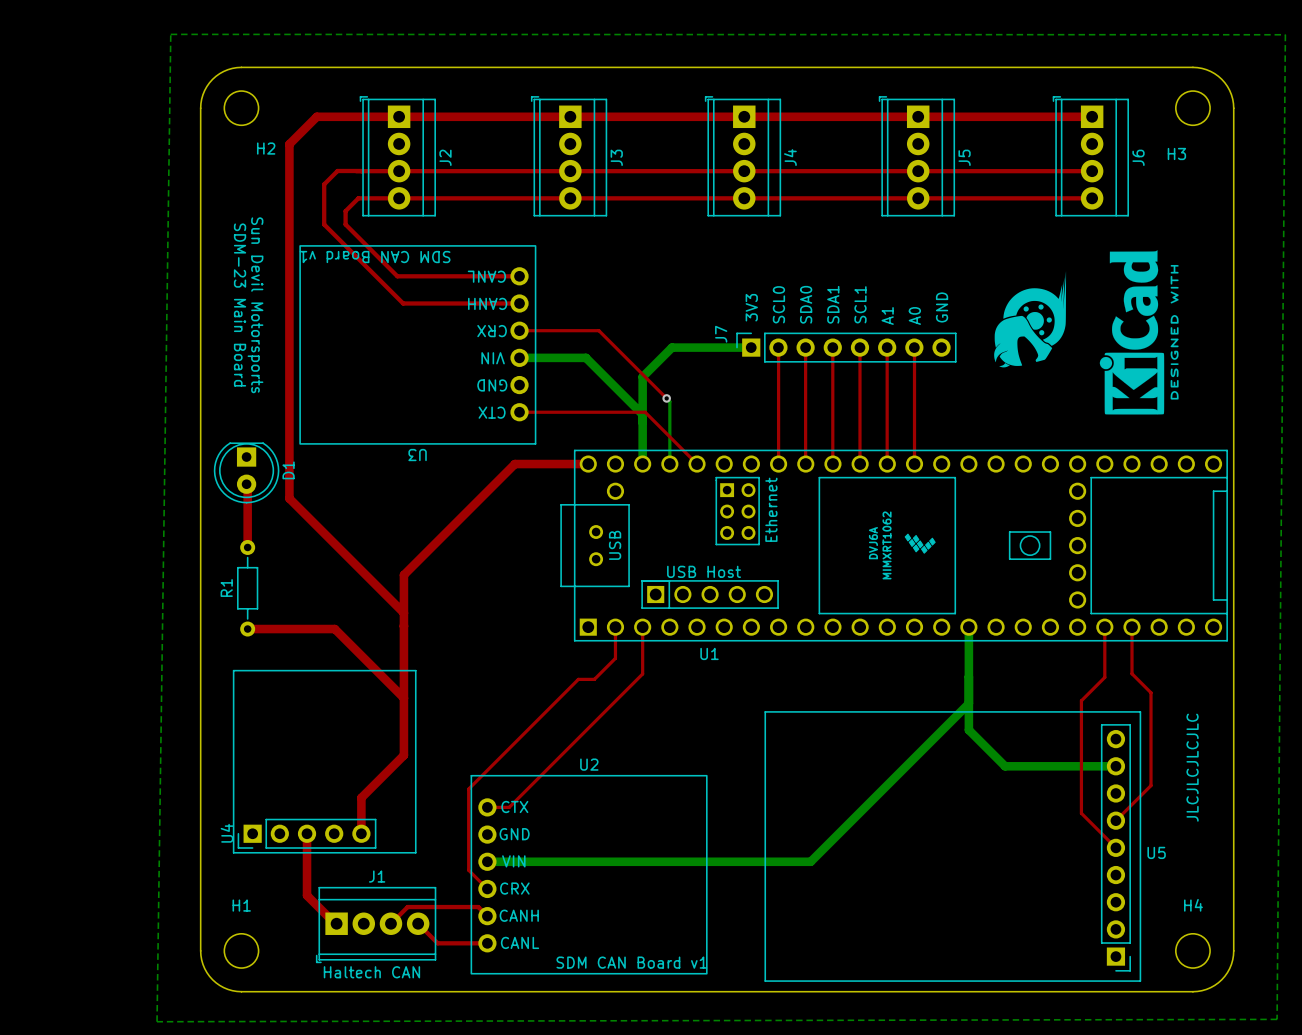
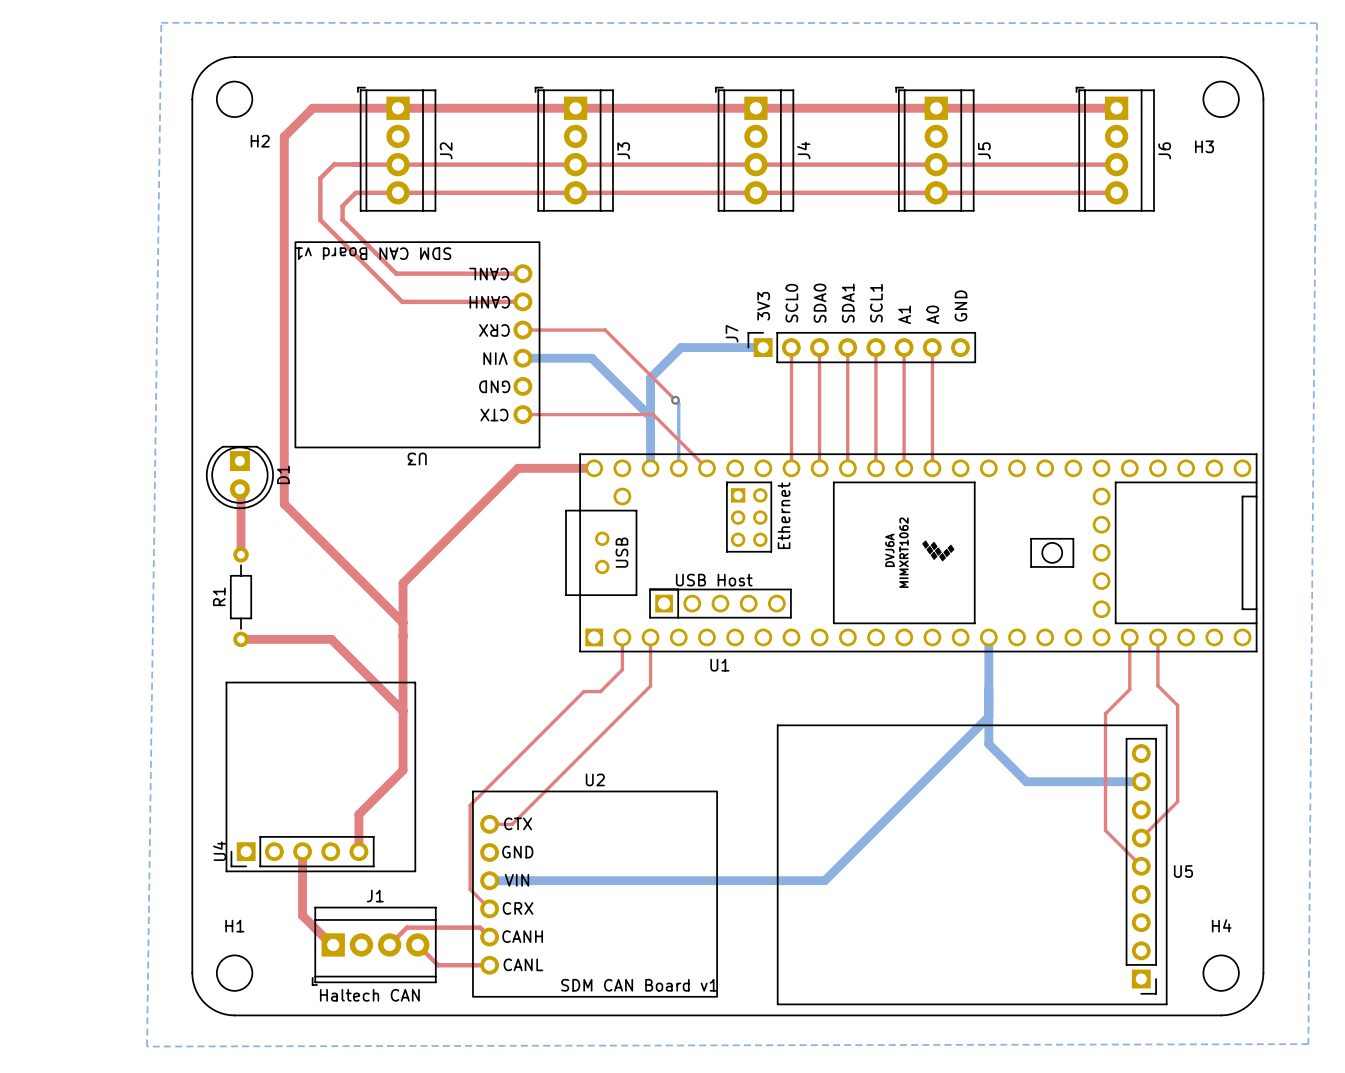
drawing: [1099, 250, 1179, 415] -> none
drawing: [994, 271, 1067, 368] -> none
text: SDM-23 Main Board (240, 305) -> none
text: Sun Devil Motorsports (255, 305) -> none
text: JLCJLCJLCJLC (1192, 767) -> none

